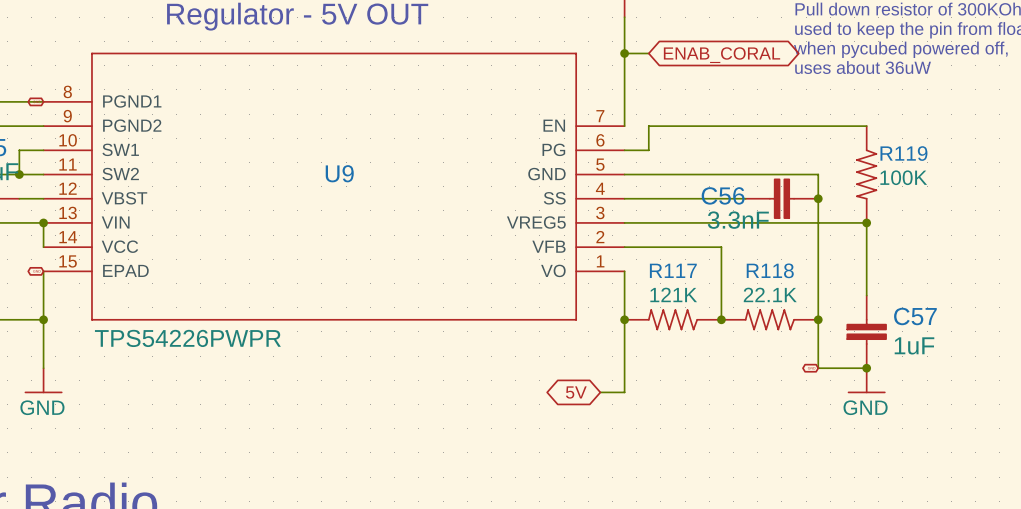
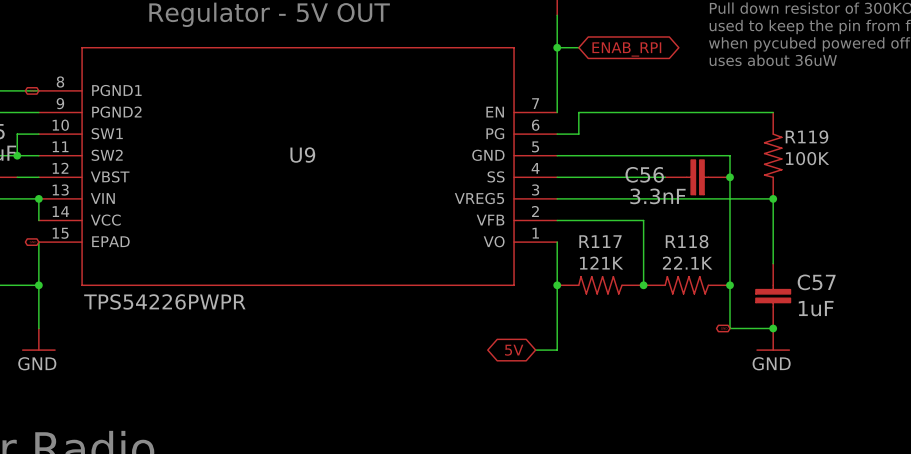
global label: ENAB_CORAL (722, 55) -> ENAB_RPI (626, 49)

